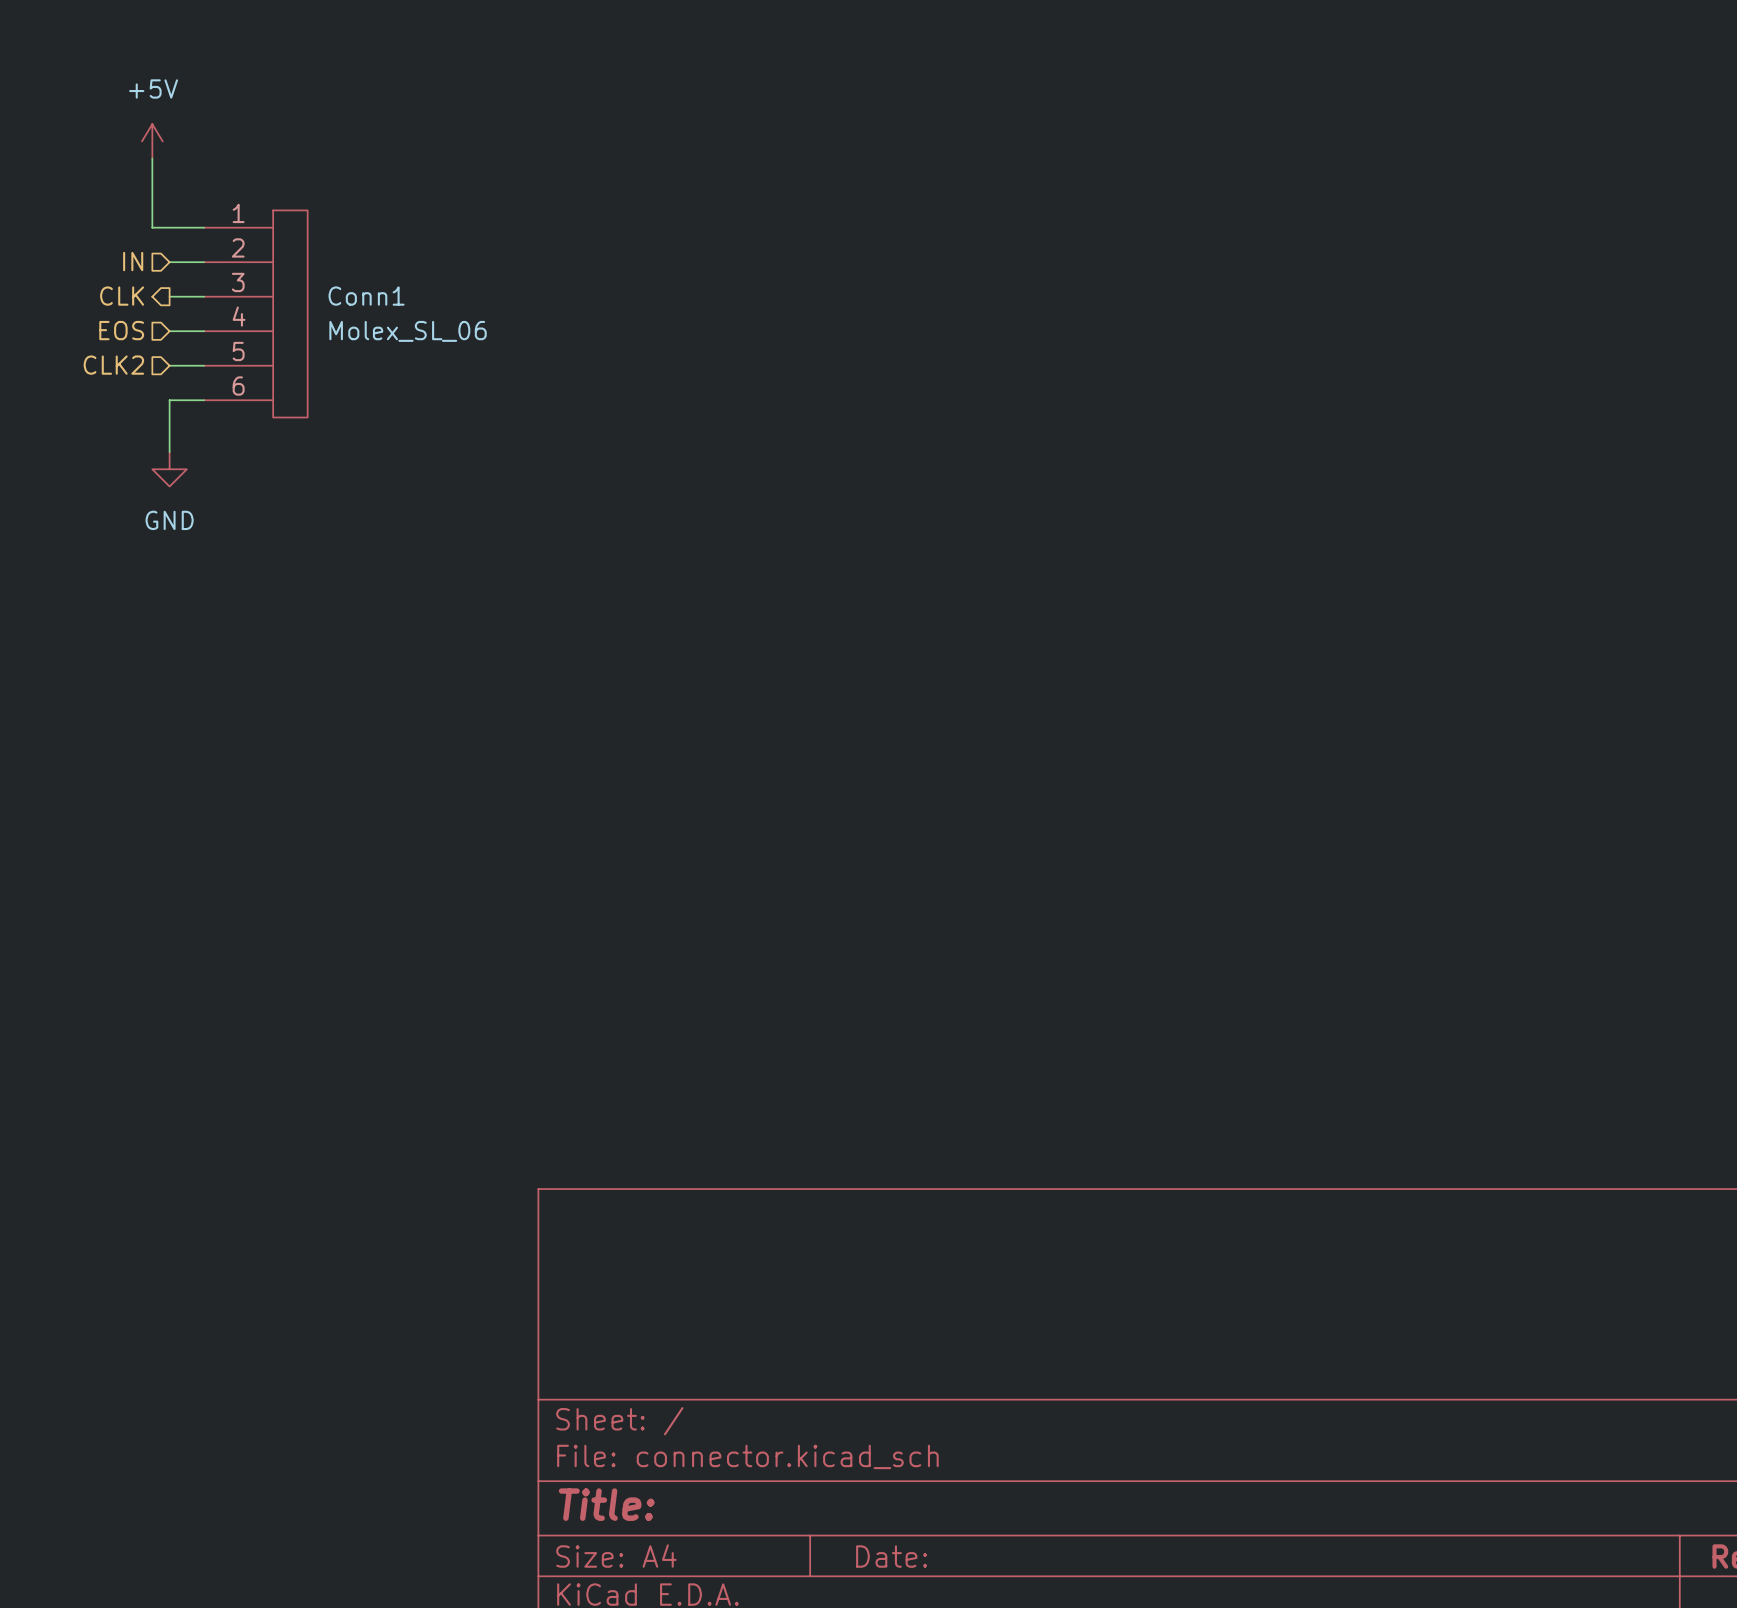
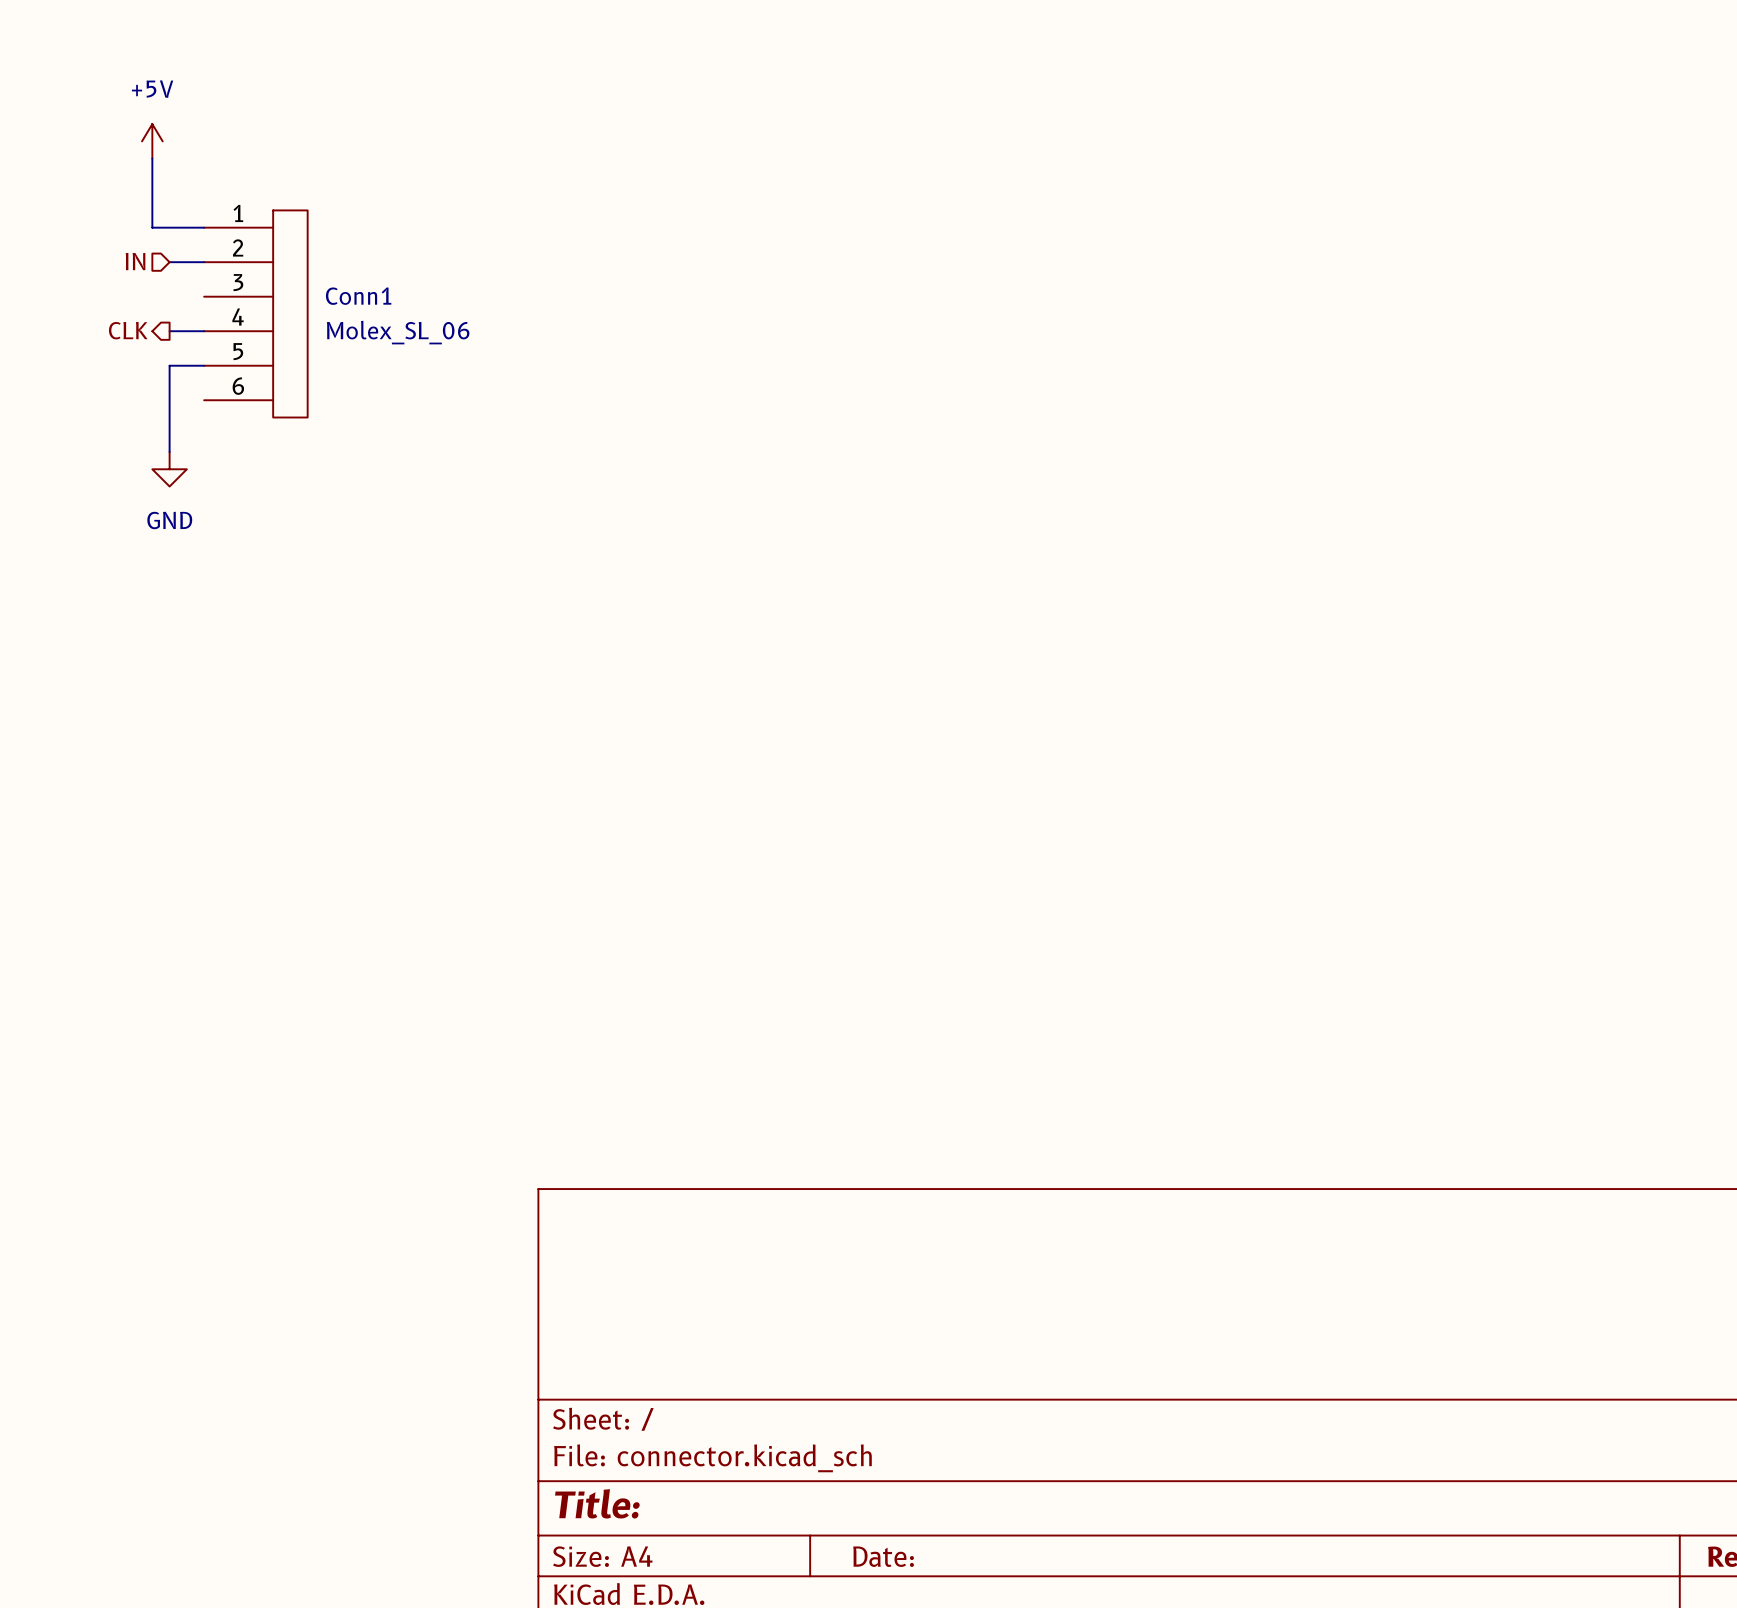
hierarchical label: CLK (122, 296) -> none
wire: (169, 296) (204, 296) -> none
hierarchical label shape: input (121, 330) -> output (128, 330)
hierarchical label: EOS (121, 330) -> CLK (128, 330)
hierarchical label: CLK2 (113, 365) -> none
wire: (169, 400) (204, 400) -> (169, 400) (169, 365)

